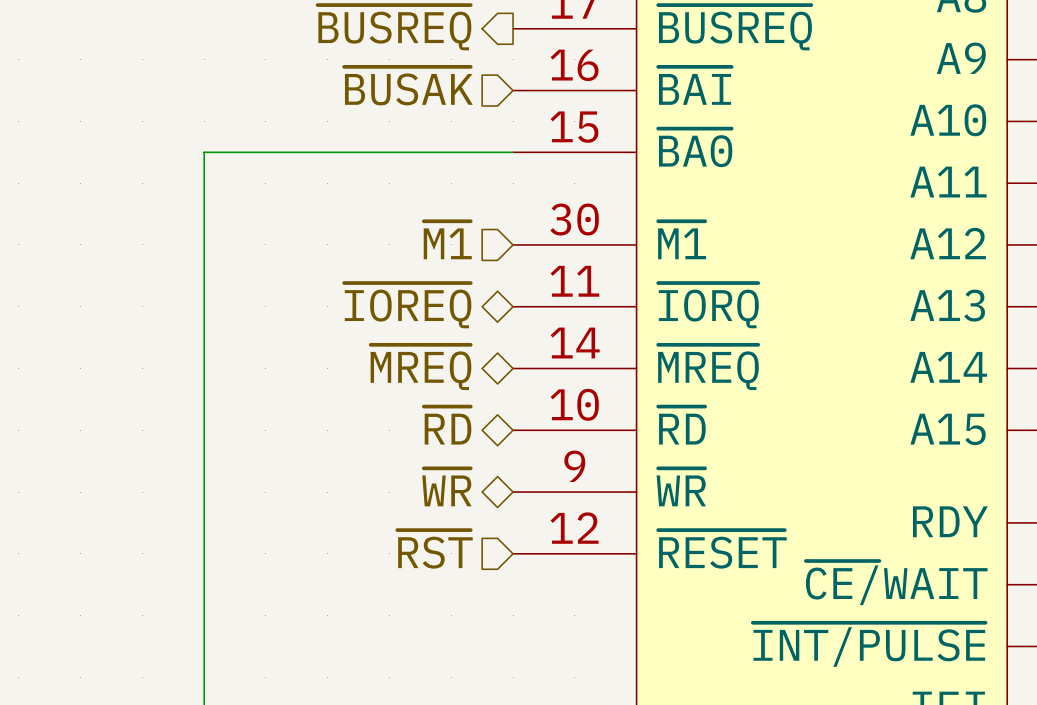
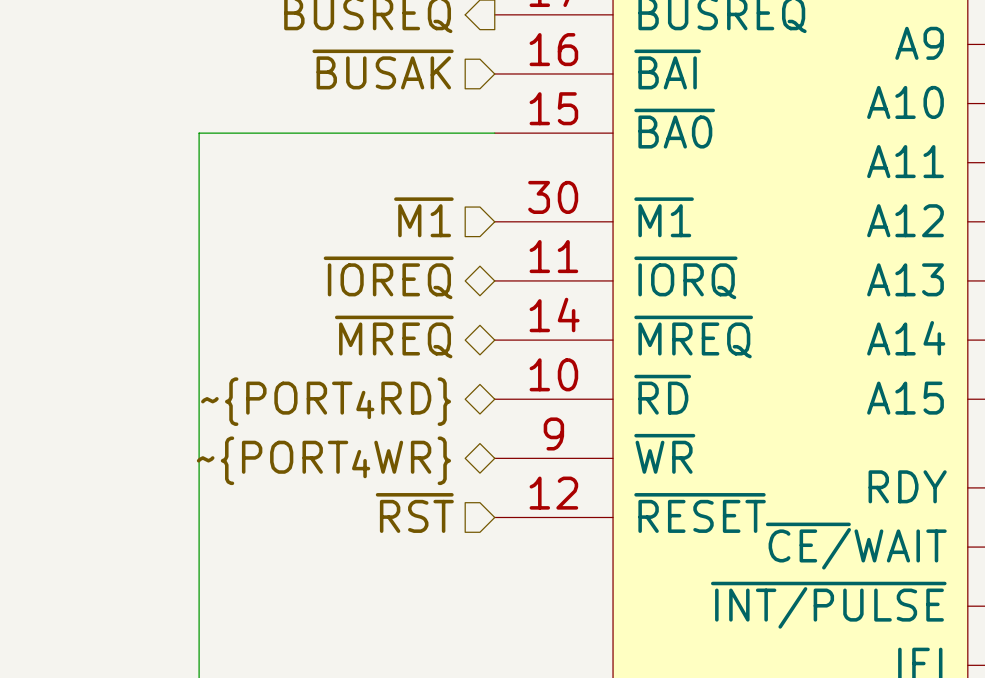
hierarchical label: ~{RD} (447, 425) -> ~{PORT4RD} (326, 401)
hierarchical label: ~{WR} (446, 487) -> ~{PORT4WR} (323, 460)

